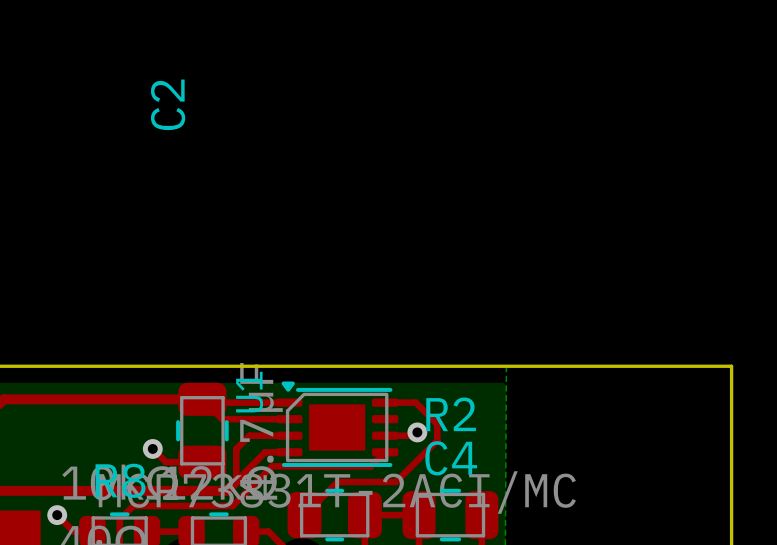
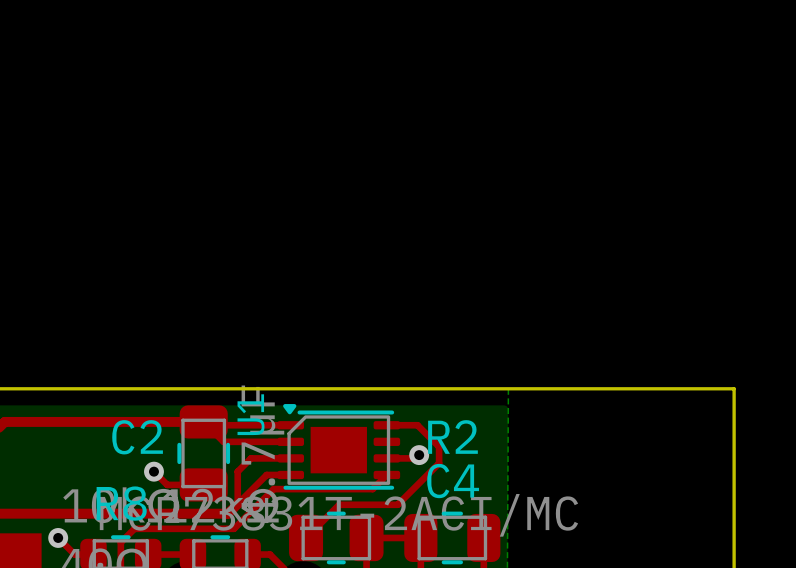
C2 name rotation: 0° (168, 104) -> 90° clockwise (137, 437)
C2 name position: C2 (168, 104) -> C2 (137, 437)

